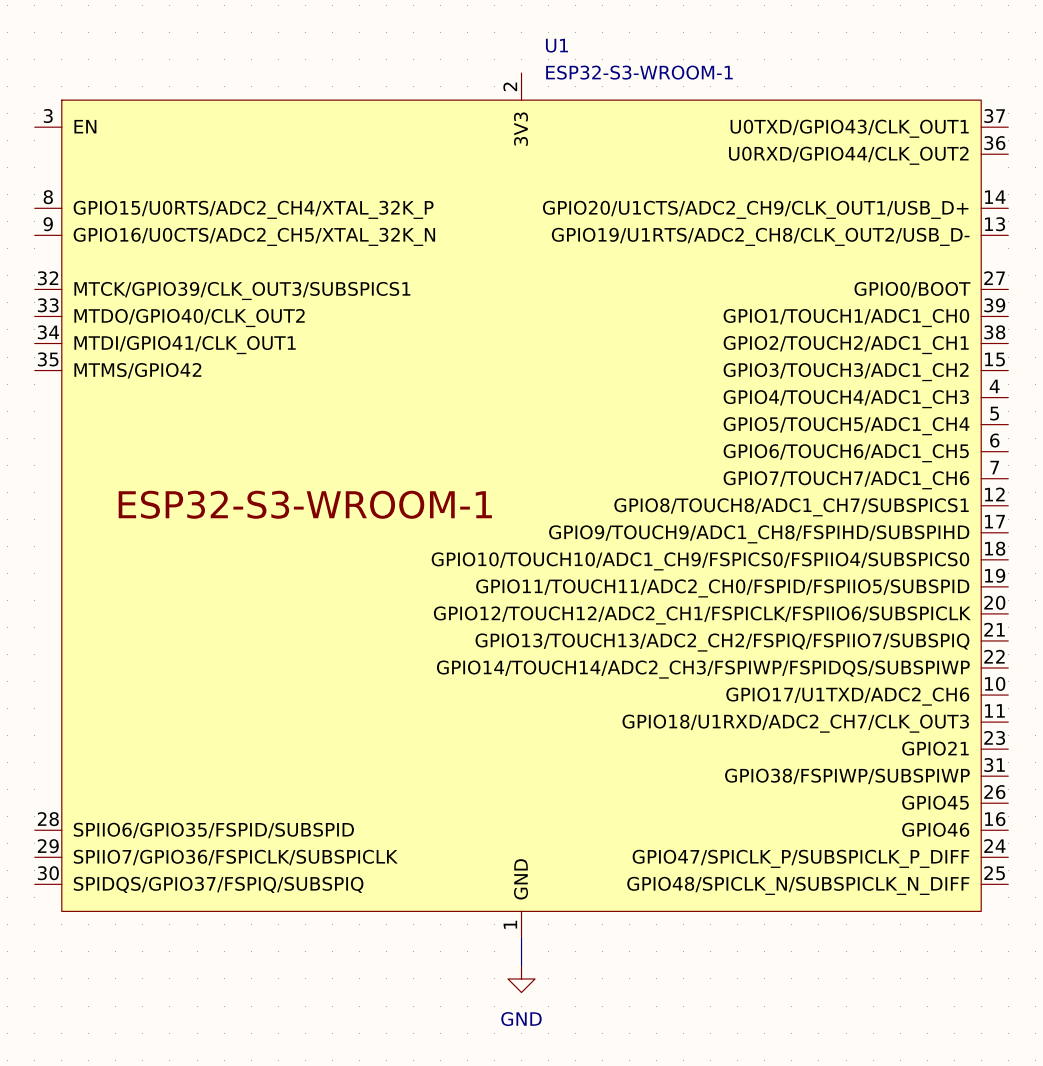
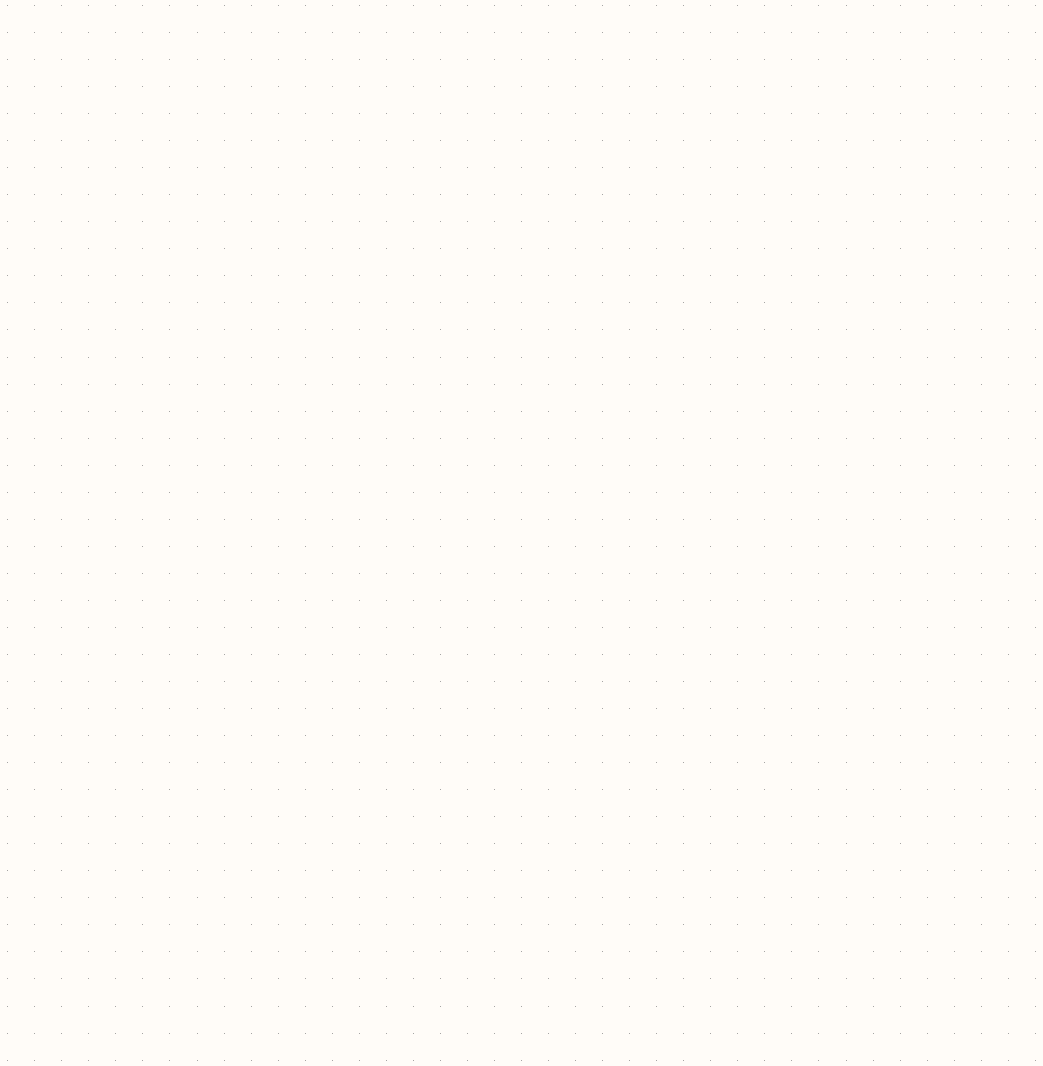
U1: ESP32-S3-WROOM-1 (521, 505) -> none
wire: (521, 938) (521, 965) -> none
power symbol: GND (521, 978) -> none

